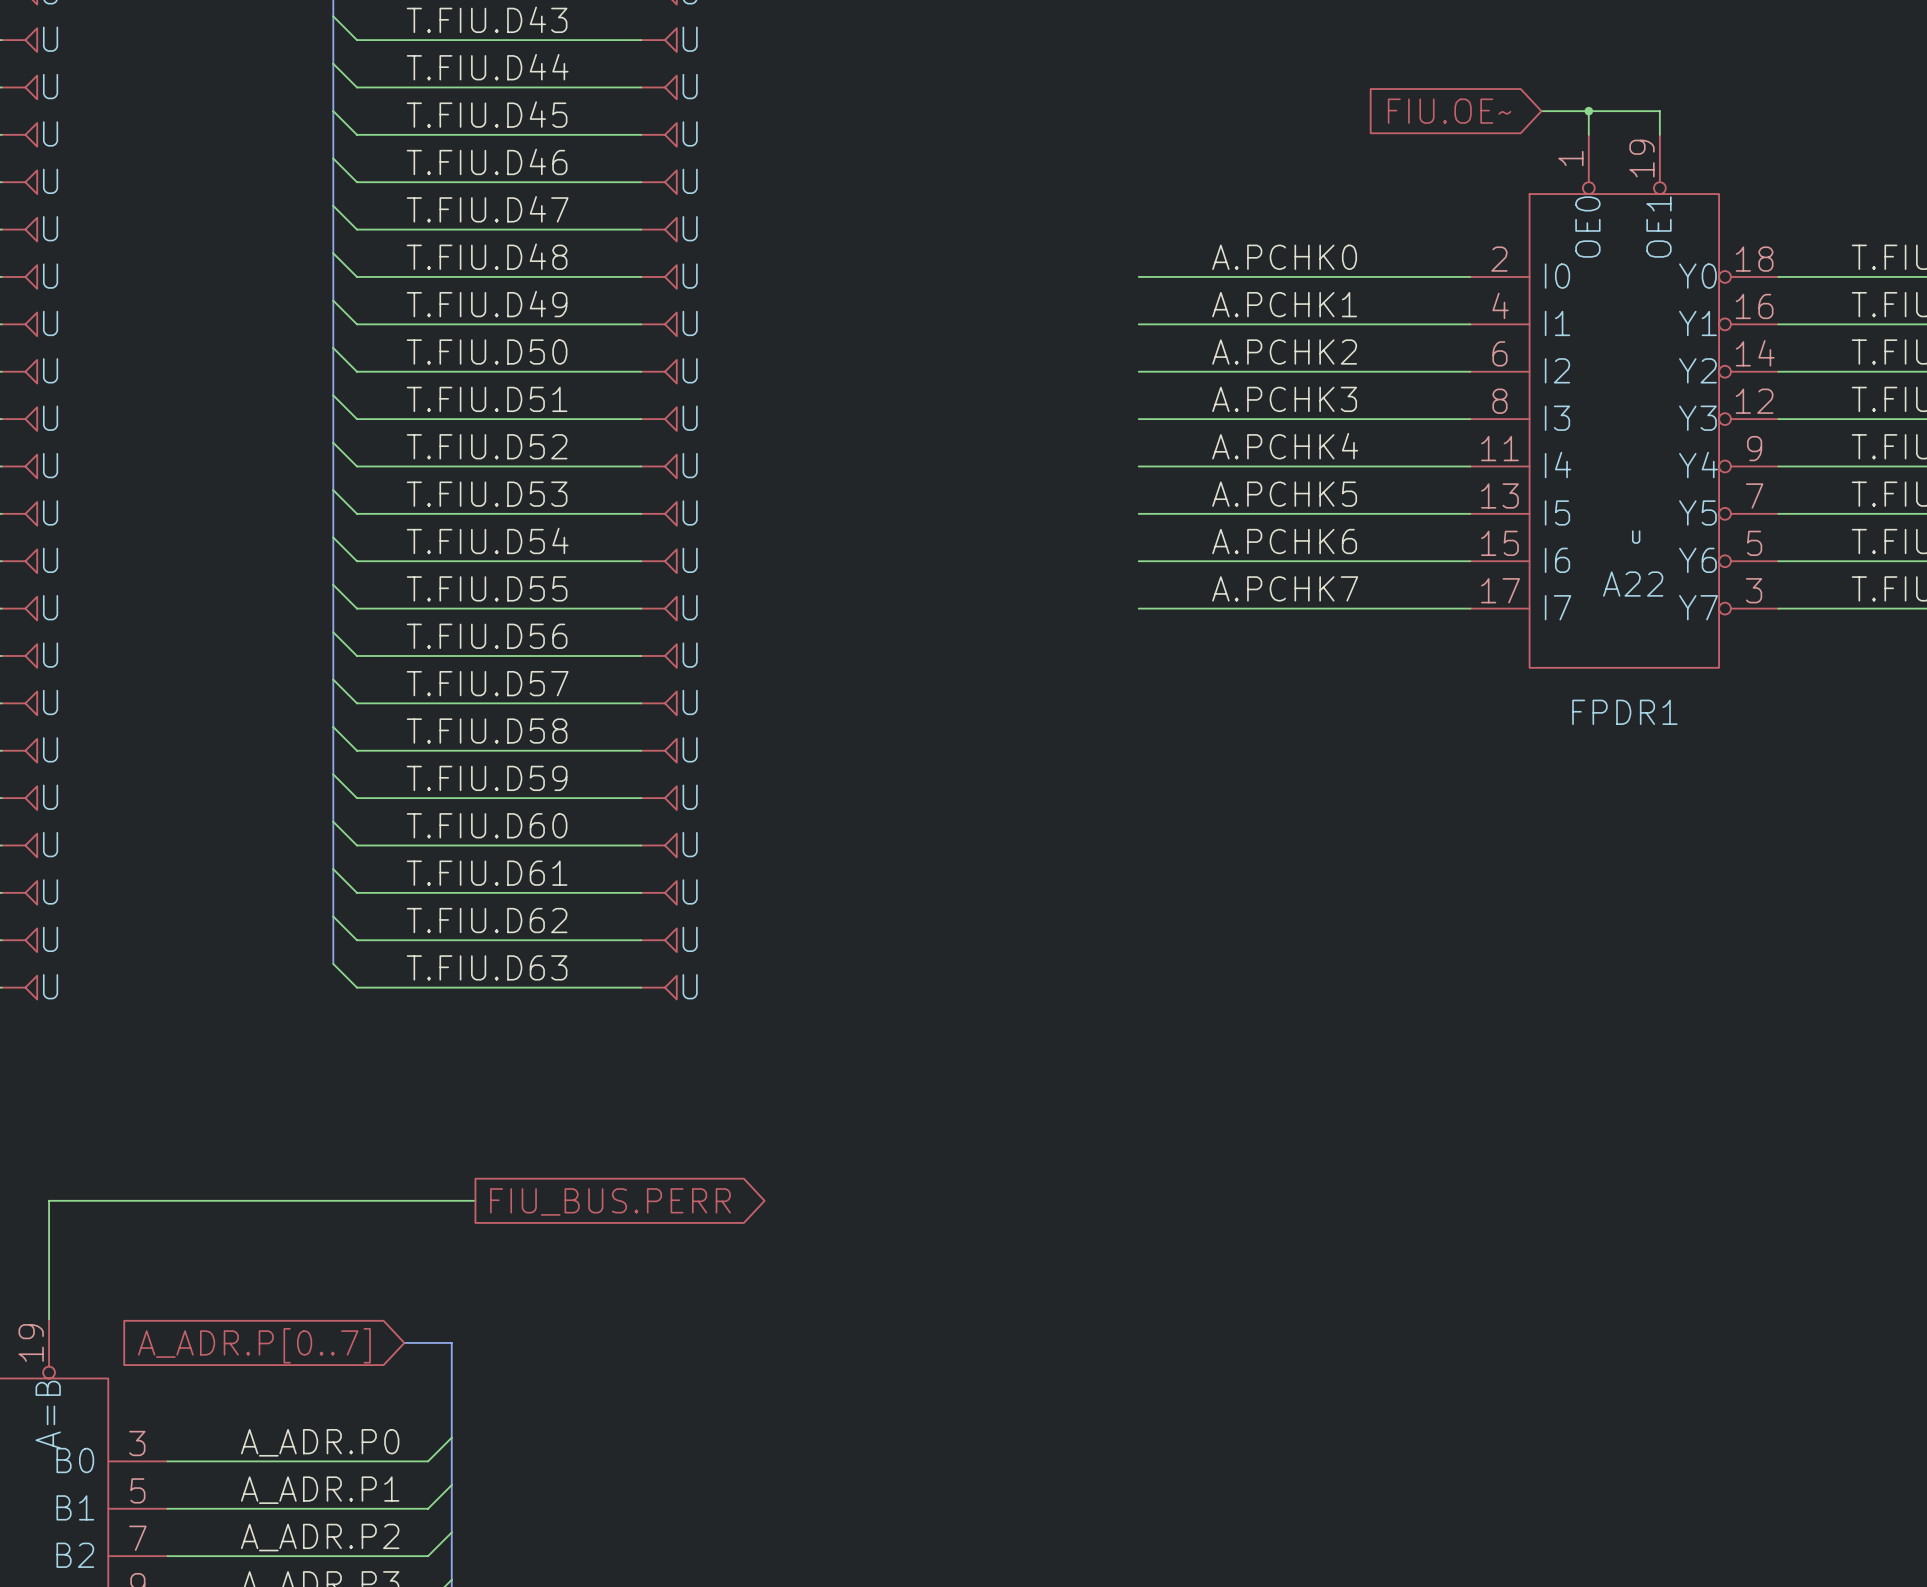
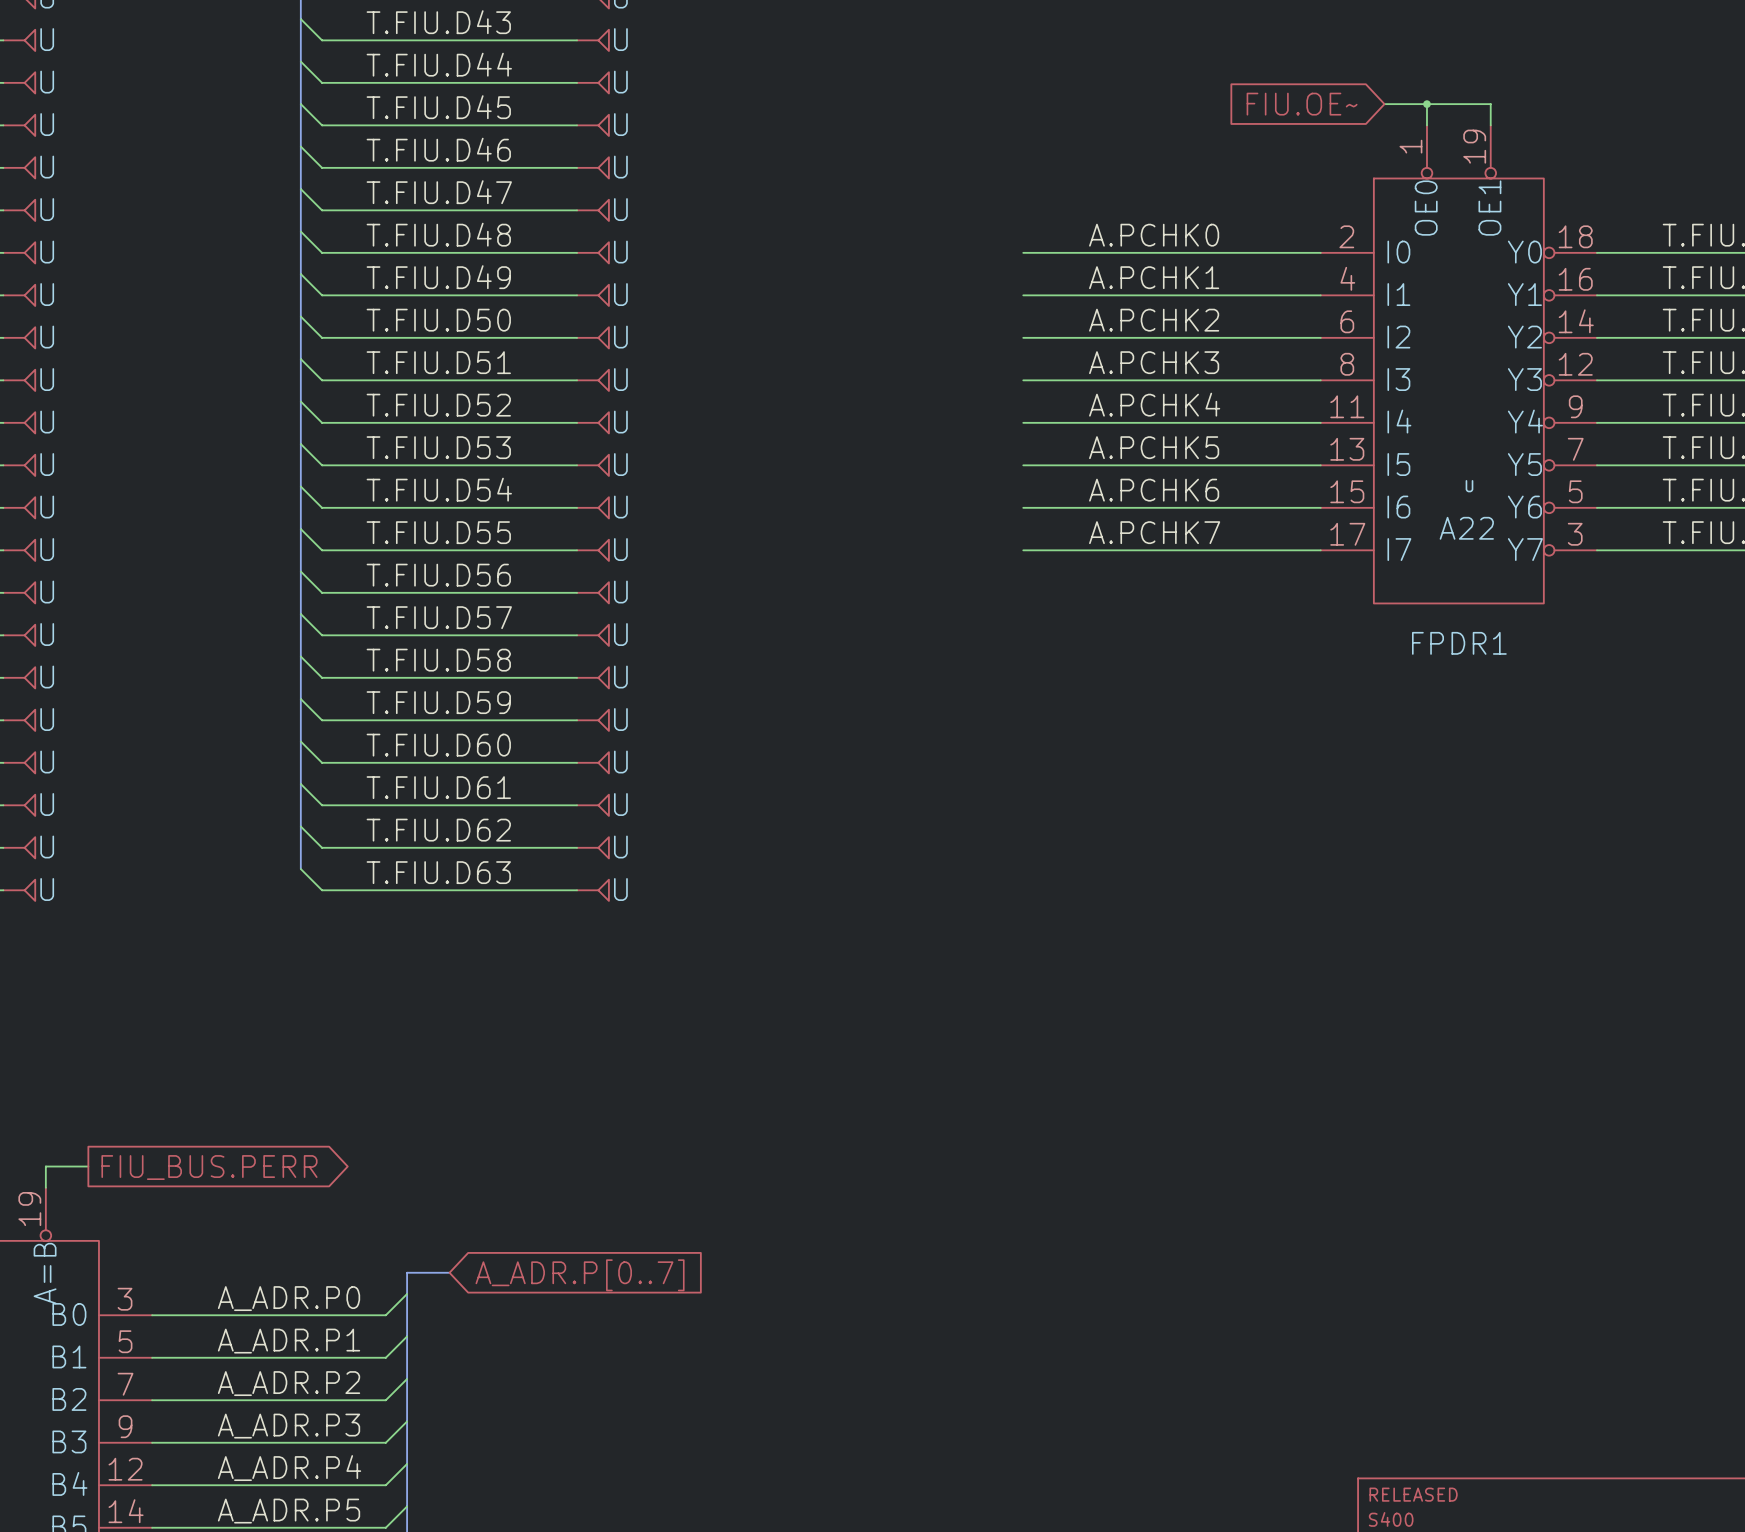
wire: (475, 1200) (49, 1200) (49, 1295) -> (88, 1166) (45, 1166)
global label: FIU_BUS.PERR (610, 1201) -> none
global label: none -> FIU_BUS.PERR (209, 1167)
bus: (404, 1342) (451, 1342) (451, 1414) -> (449, 1272) (407, 1272)
global label rotation: 0° (254, 1345) -> 180° (580, 1275)
global label position: A_ADR.P[0..7] (254, 1345) -> A_ADR.P[0..7] (580, 1275)

